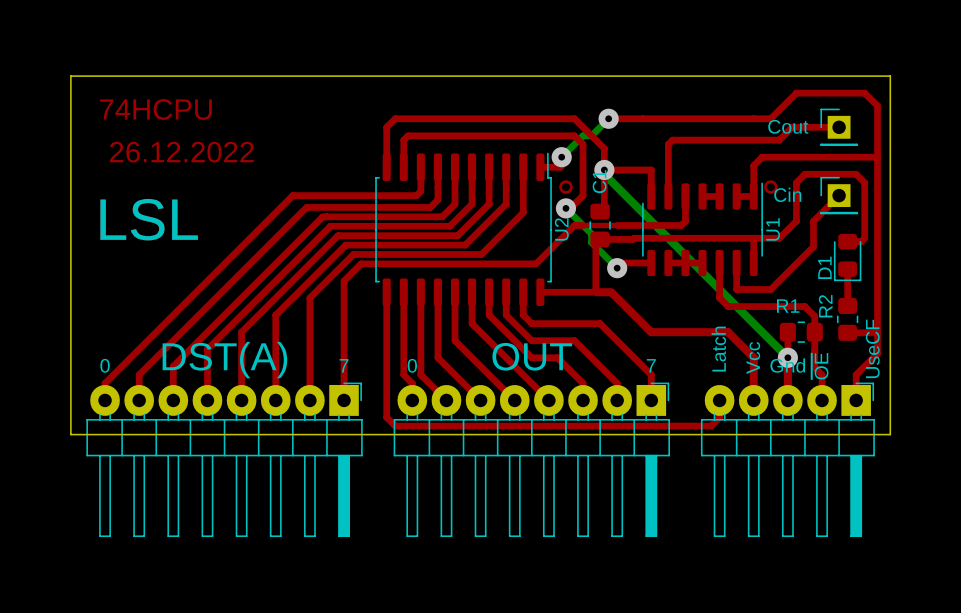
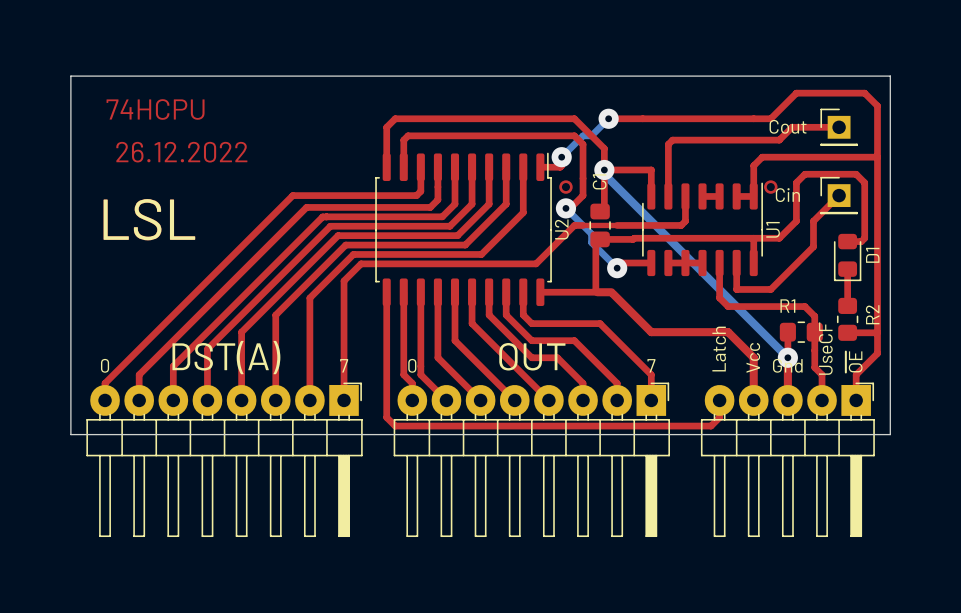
D1 name position: D1 (824, 267) -> D1 (872, 255)
R2 name position: R2 (825, 306) -> R2 (872, 314)
text position: UseCF (872, 348) -> UseCF (825, 348)
text position: ~{OE} (820, 366) -> ~{OE} (854, 361)

